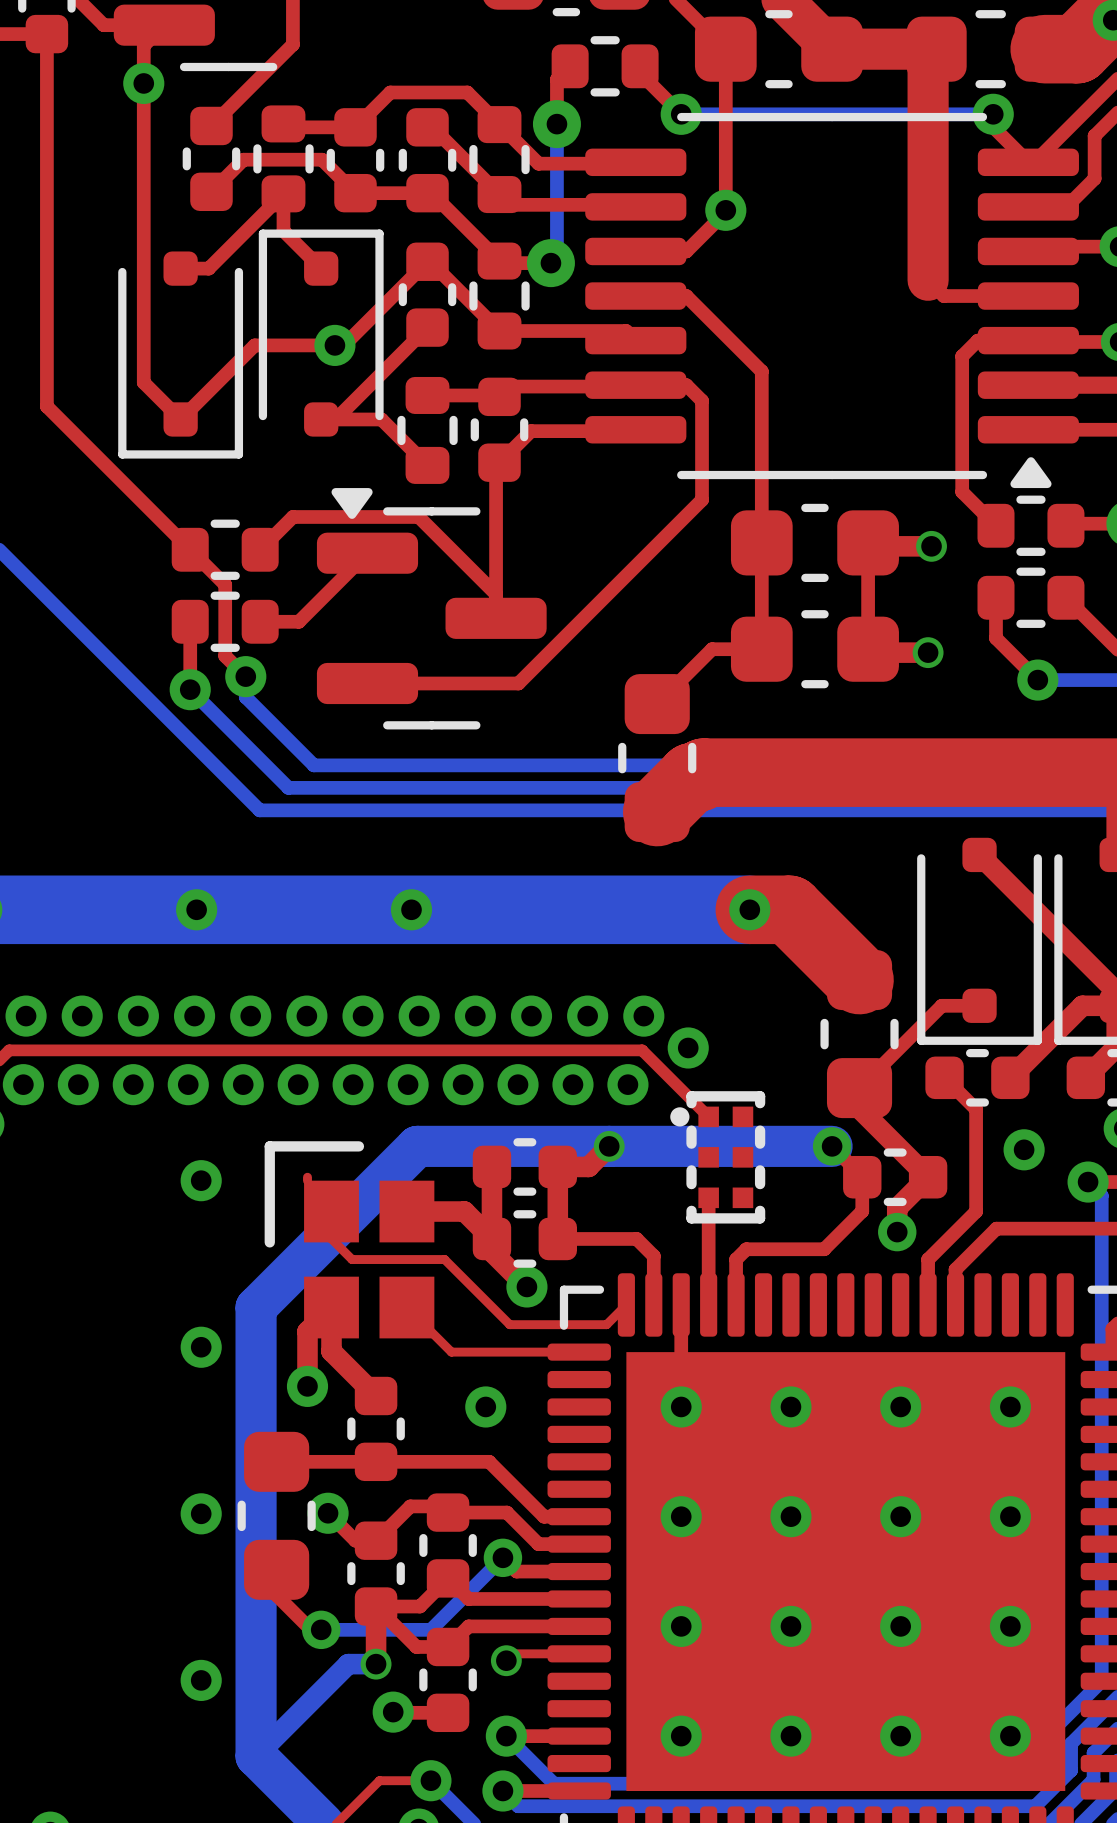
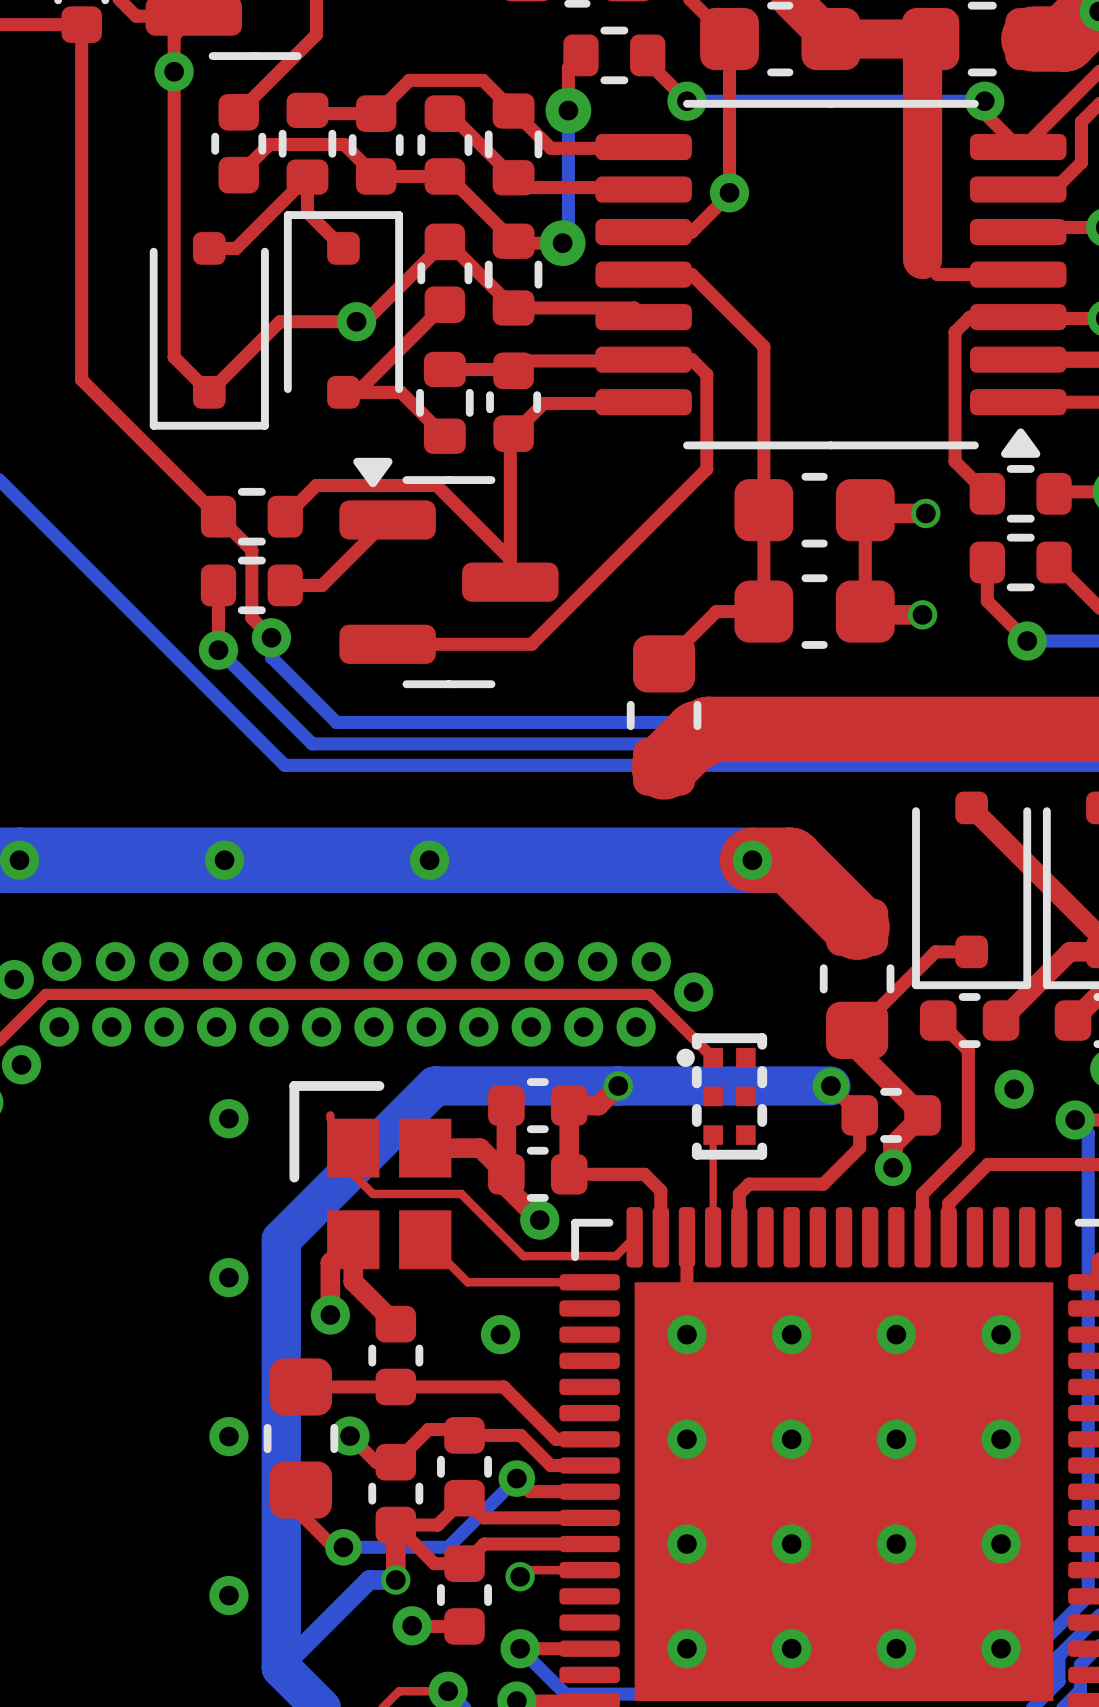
top track width: thick (708, 1201) (708, 1304) -> thin (713, 1138) (713, 1237)

